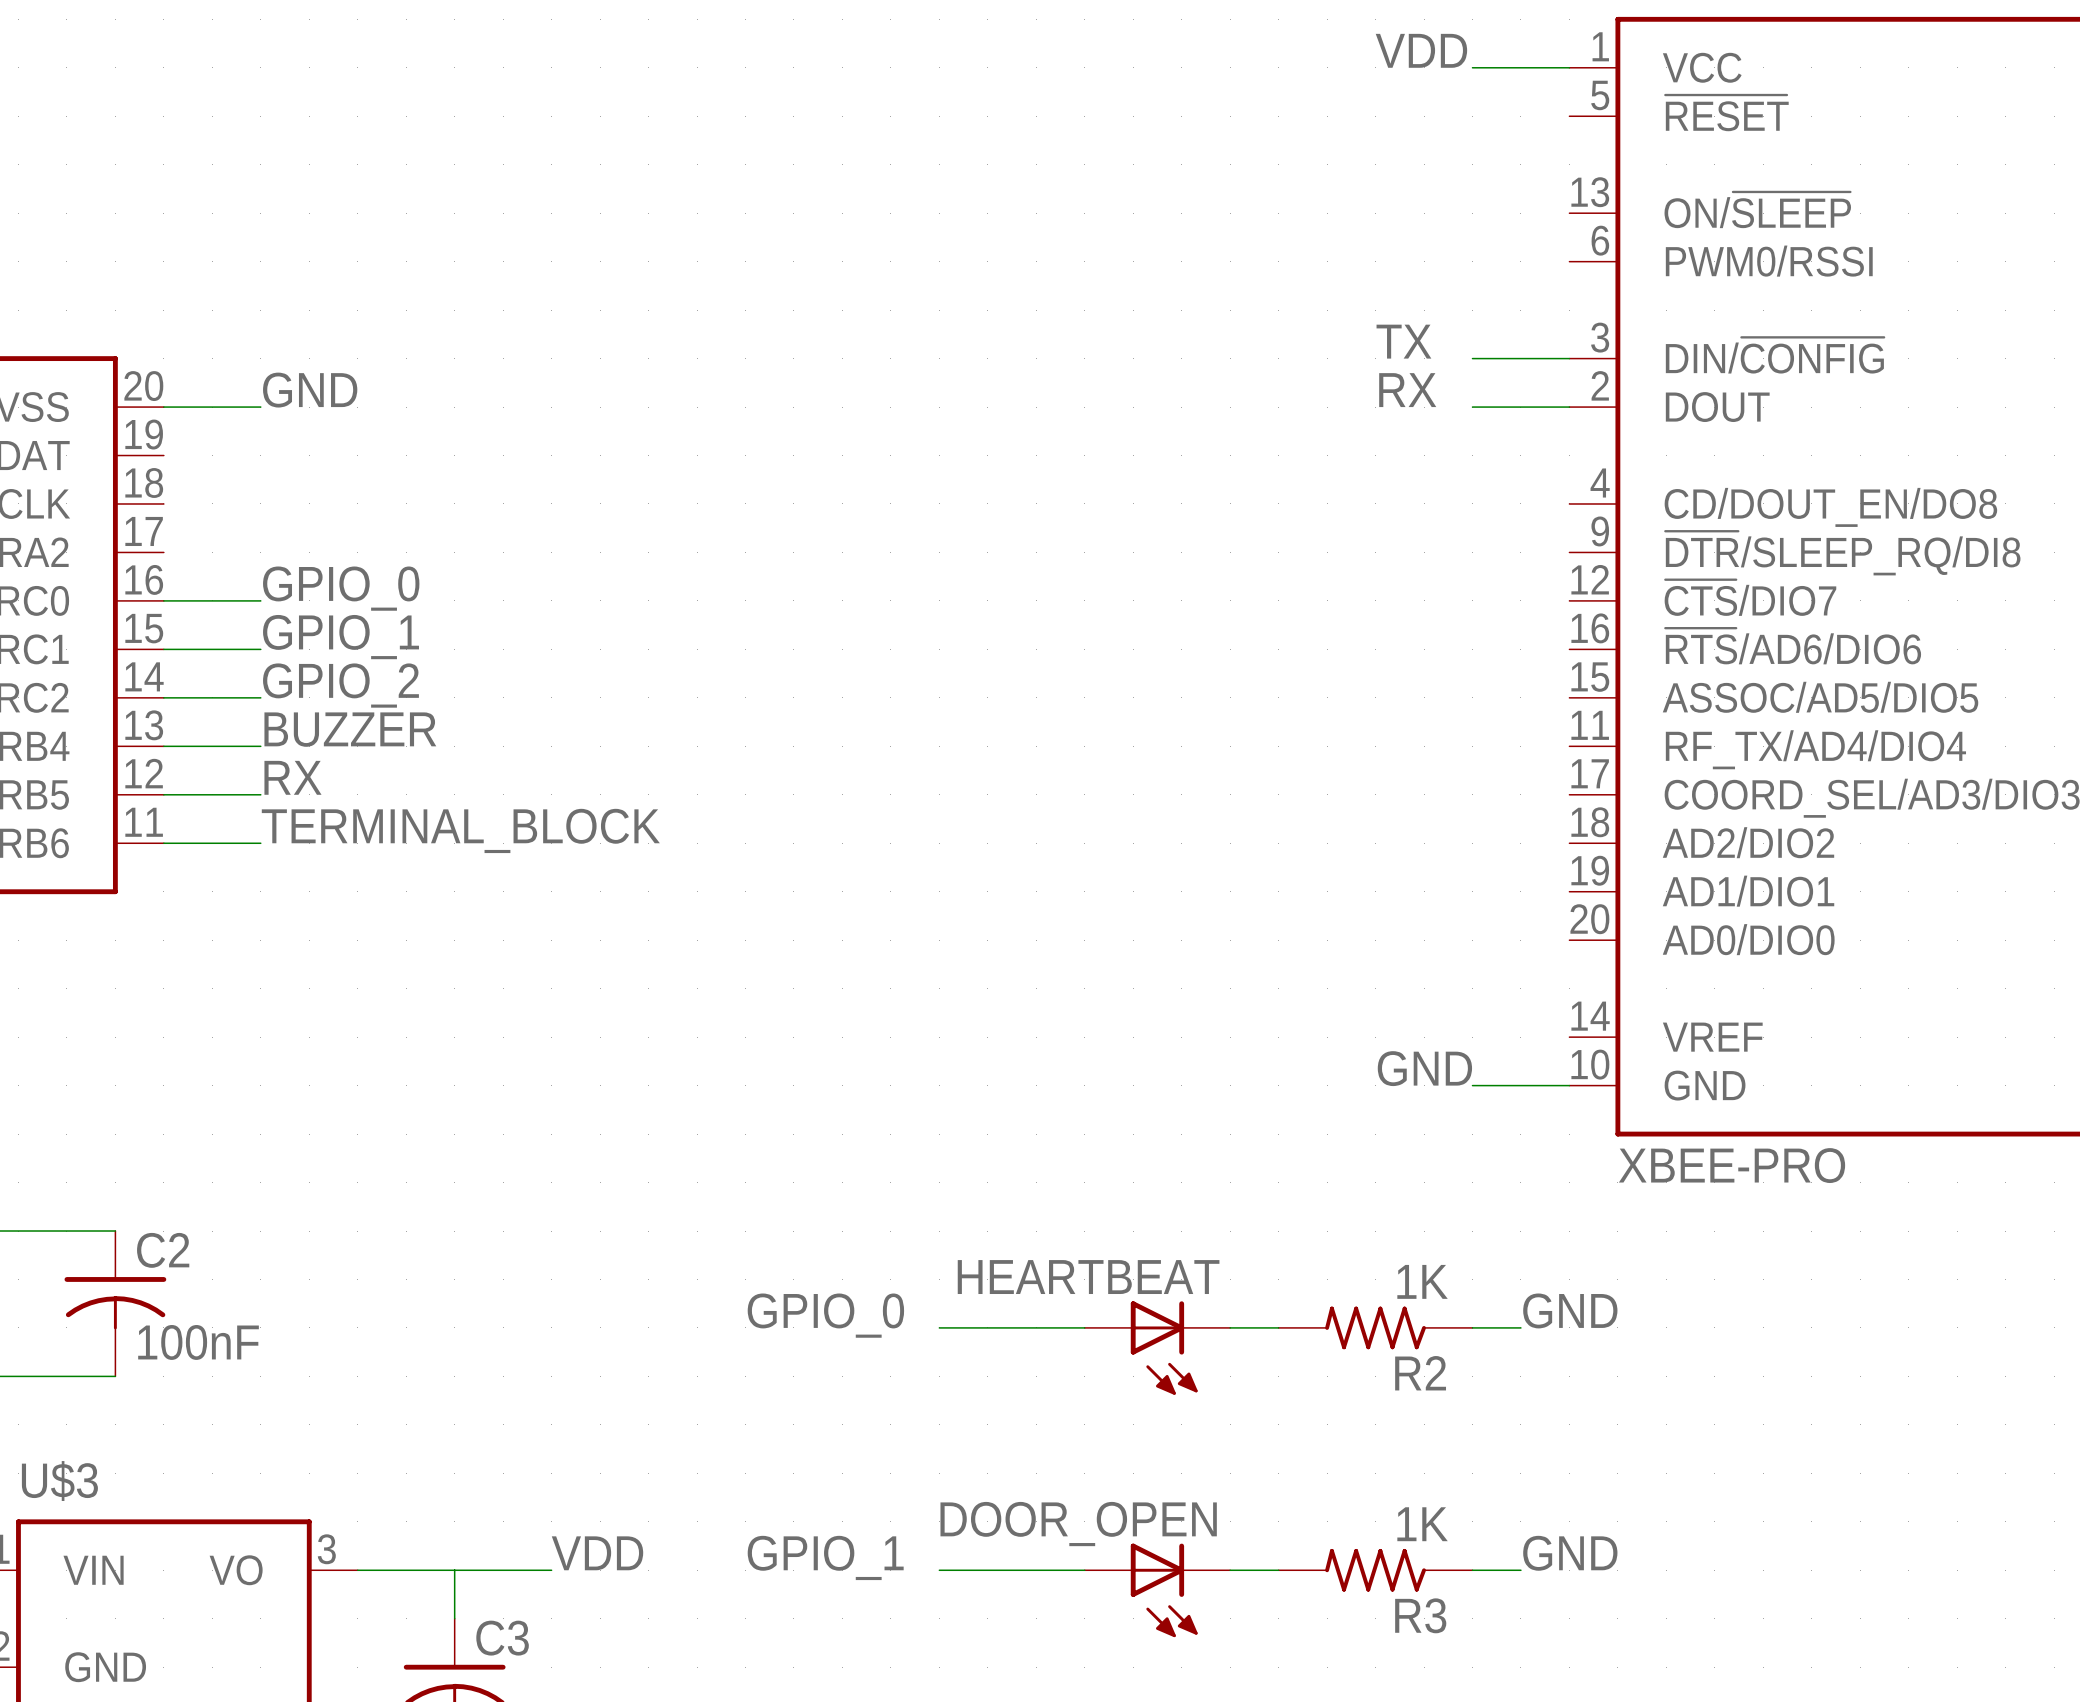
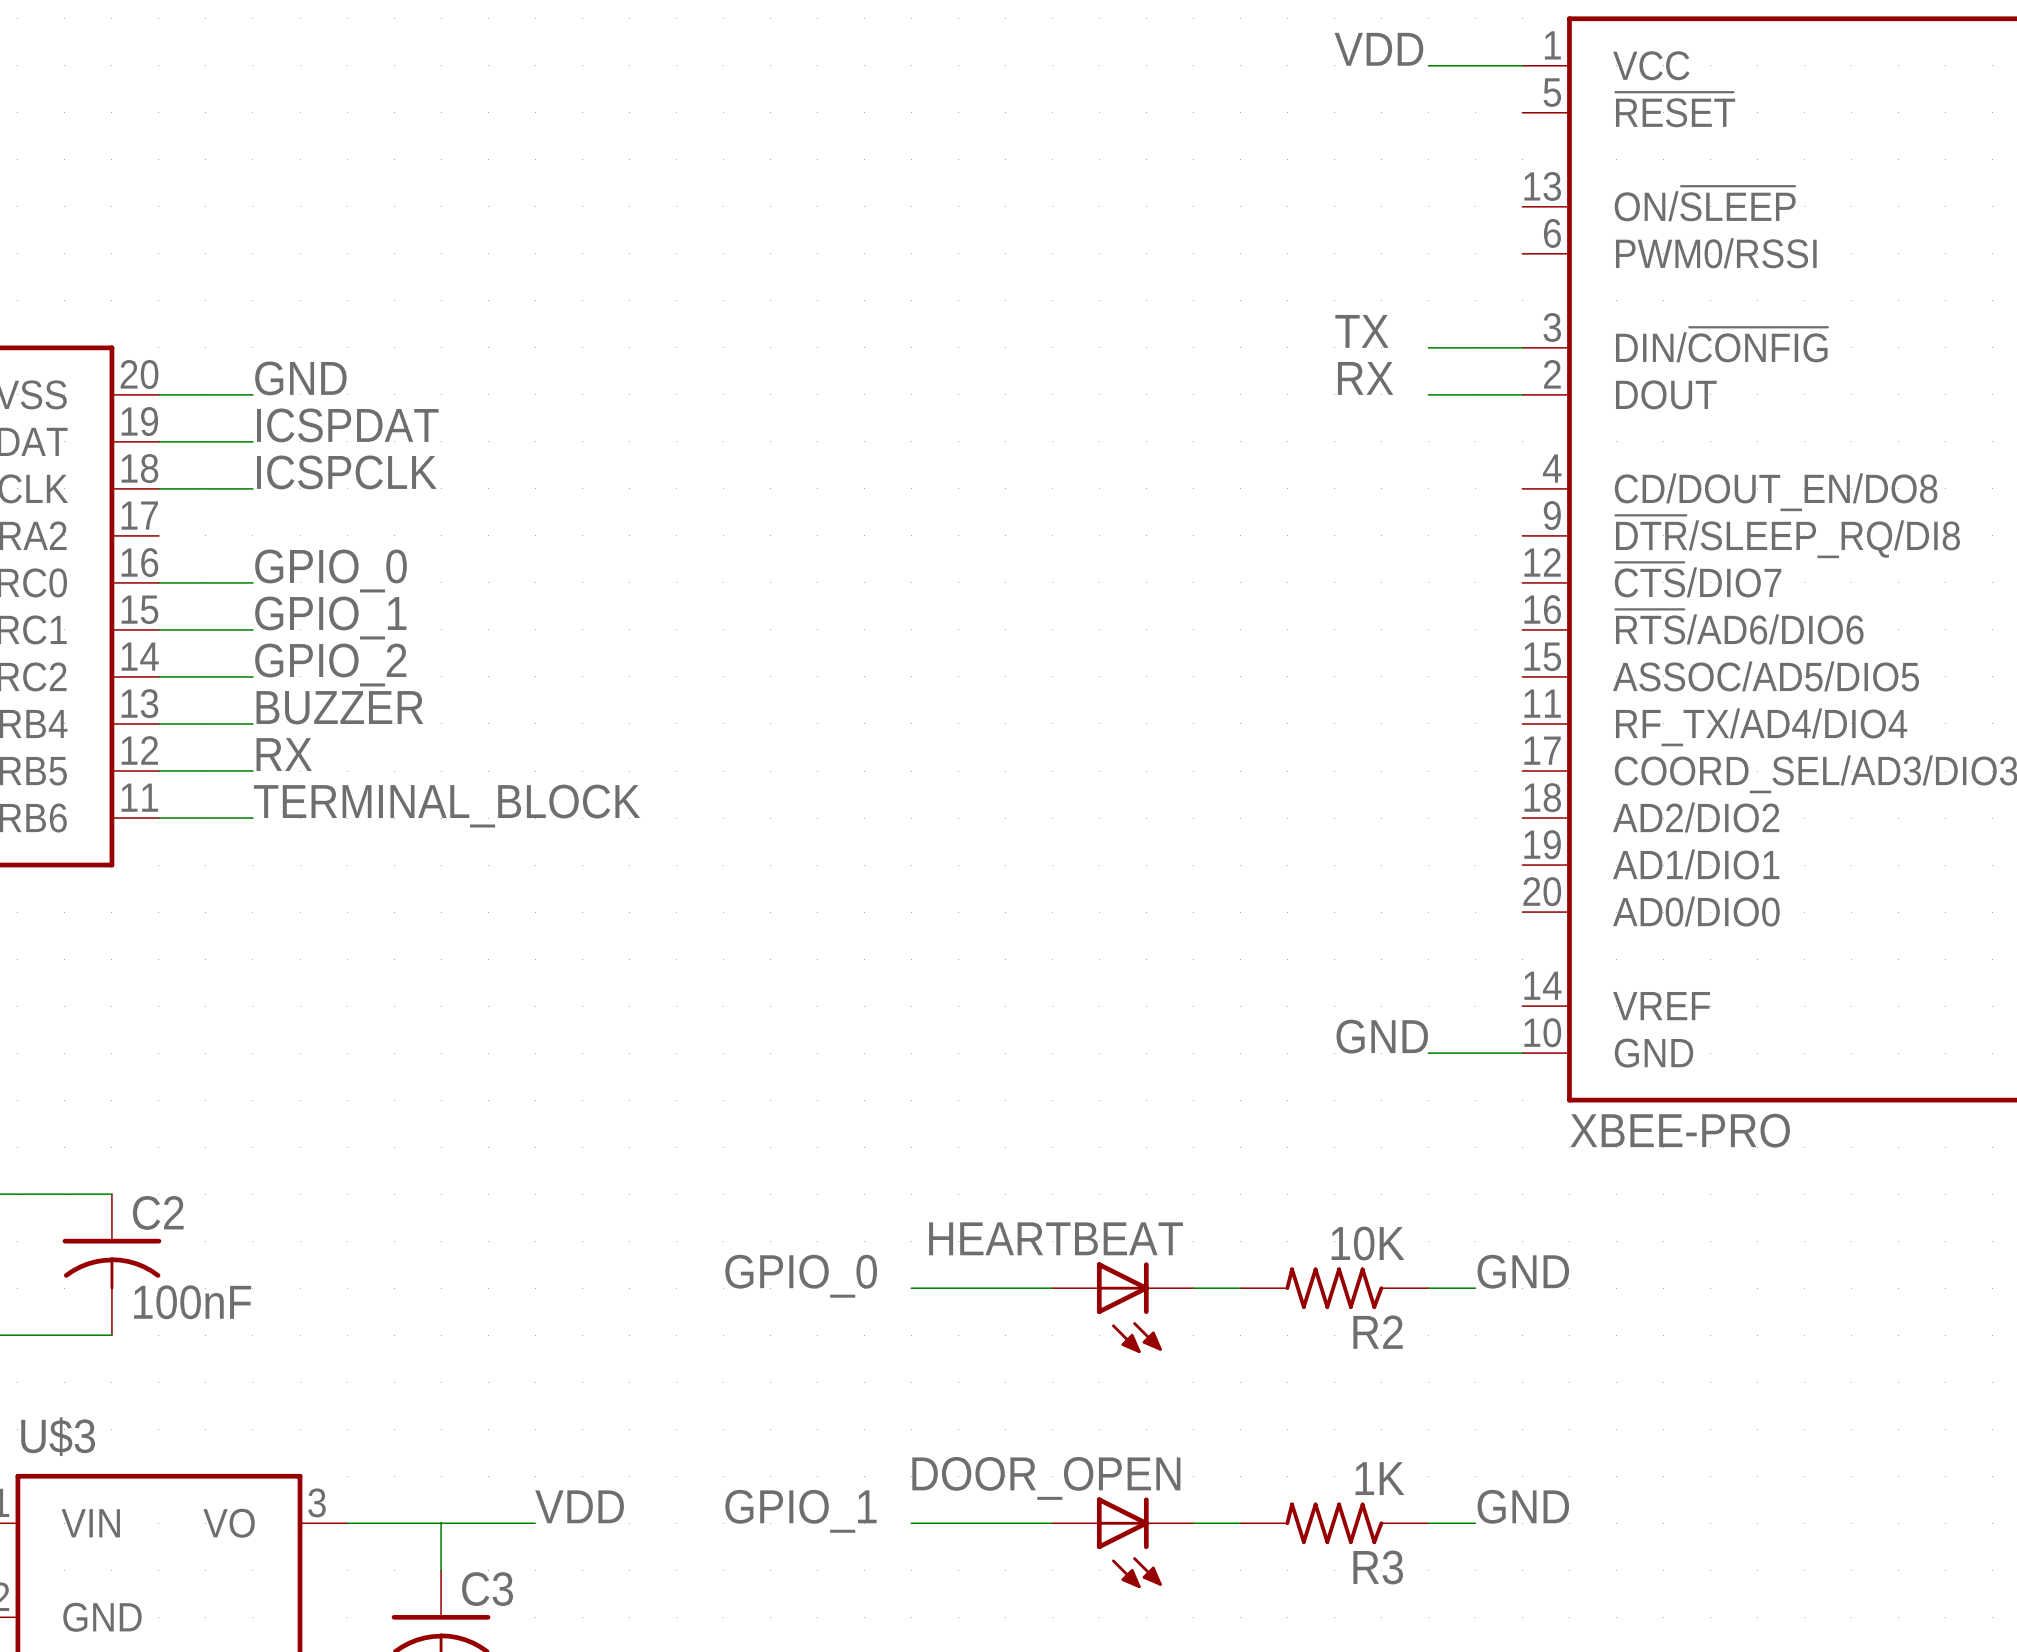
label: none -> ICSPDAT (347, 425)
wire: none -> (158, 441) (252, 441)
label: none -> ICSPCLK (346, 472)
wire: none -> (158, 488) (252, 488)
R2 value: 1K (1422, 1281) -> 10K (1367, 1243)

